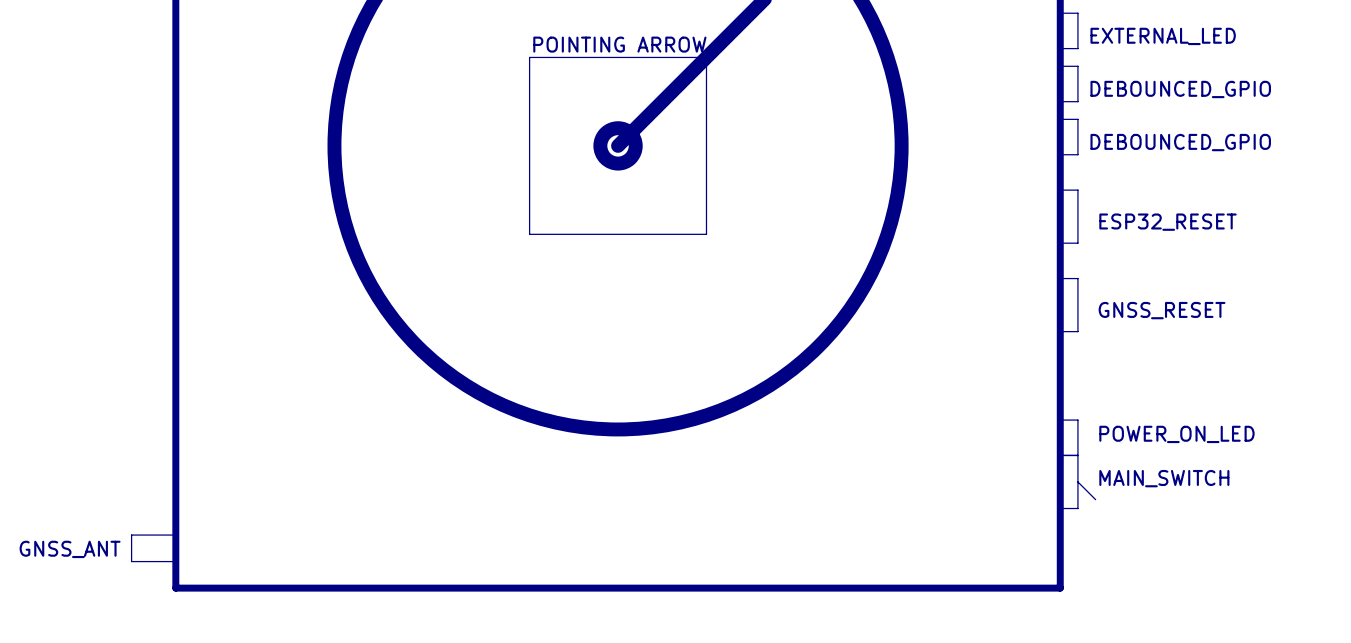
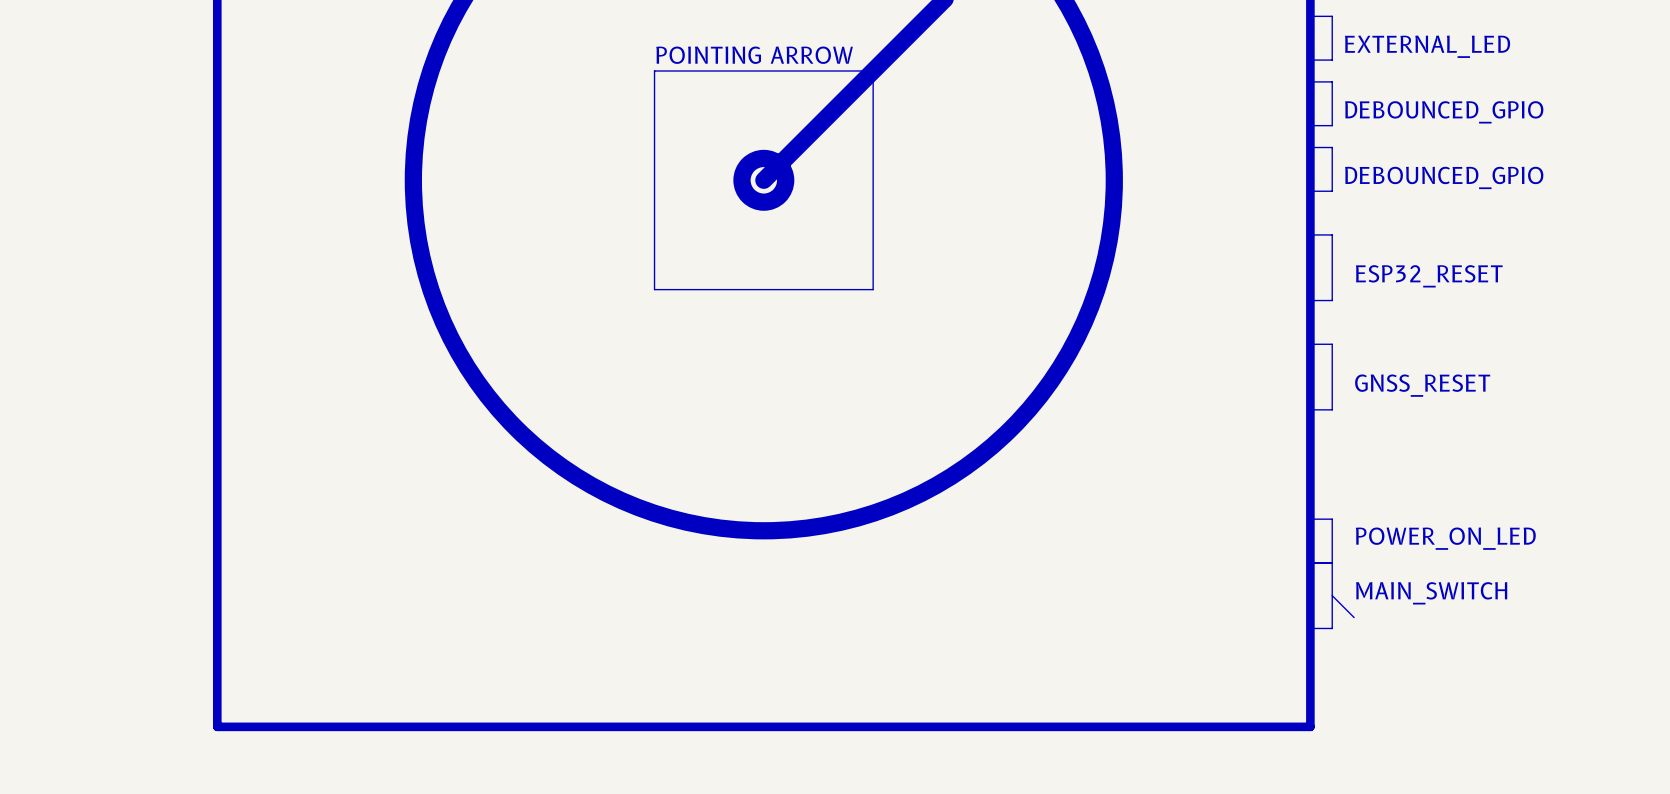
line: (131, 535) (175, 535) (175, 561) (131, 561) (131, 535) -> none
text: GNSS_ANT (70, 549) -> none

